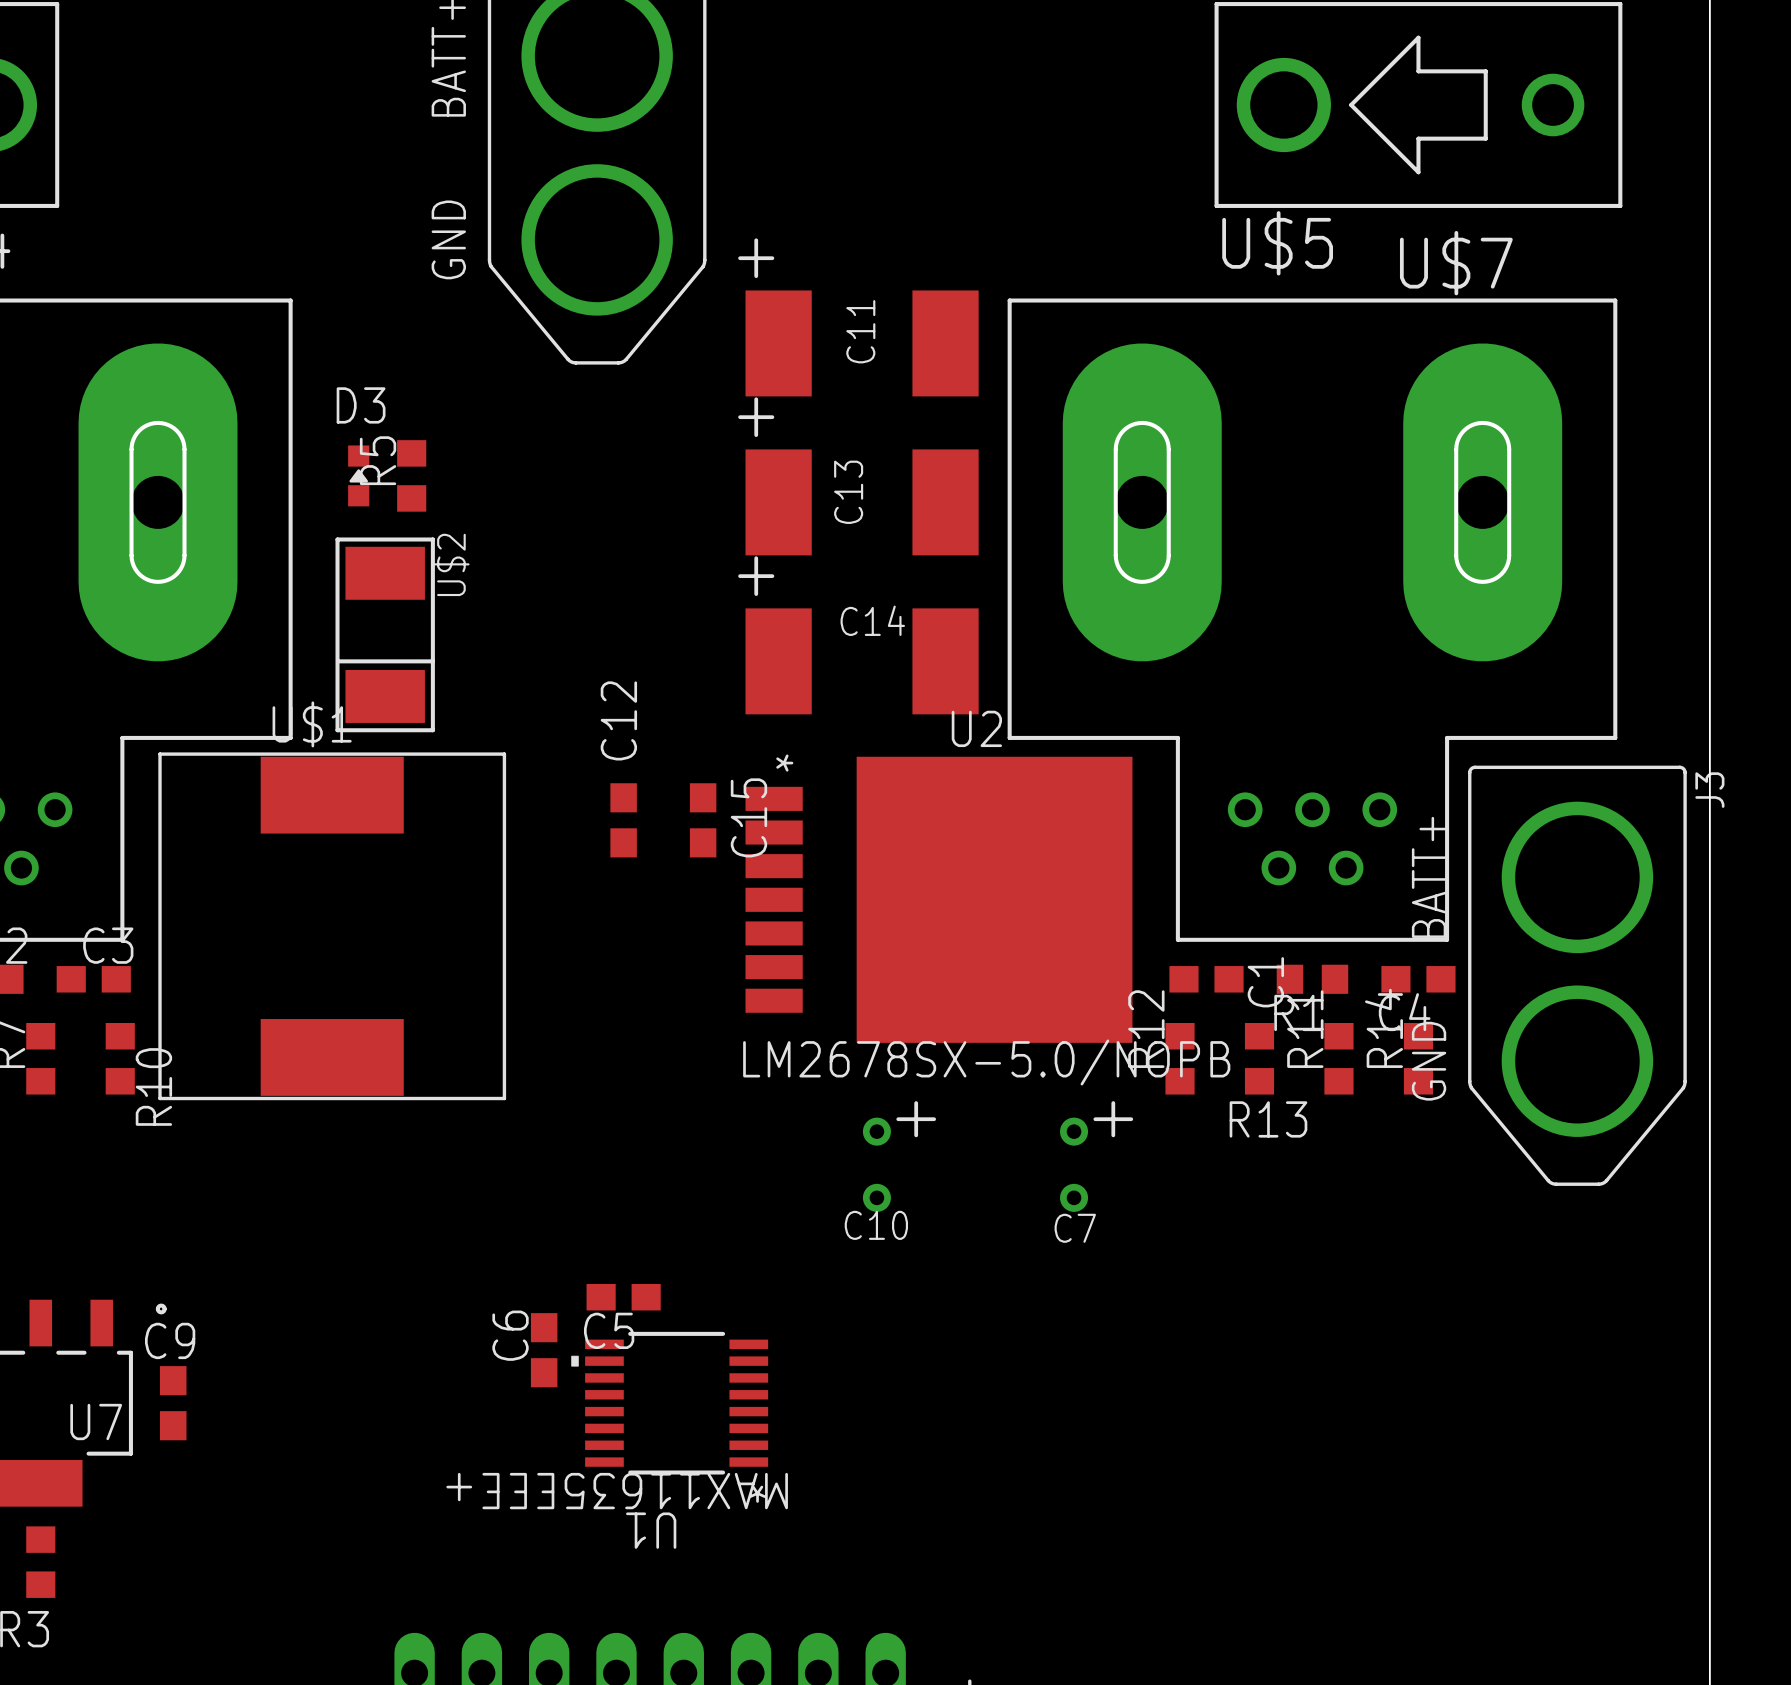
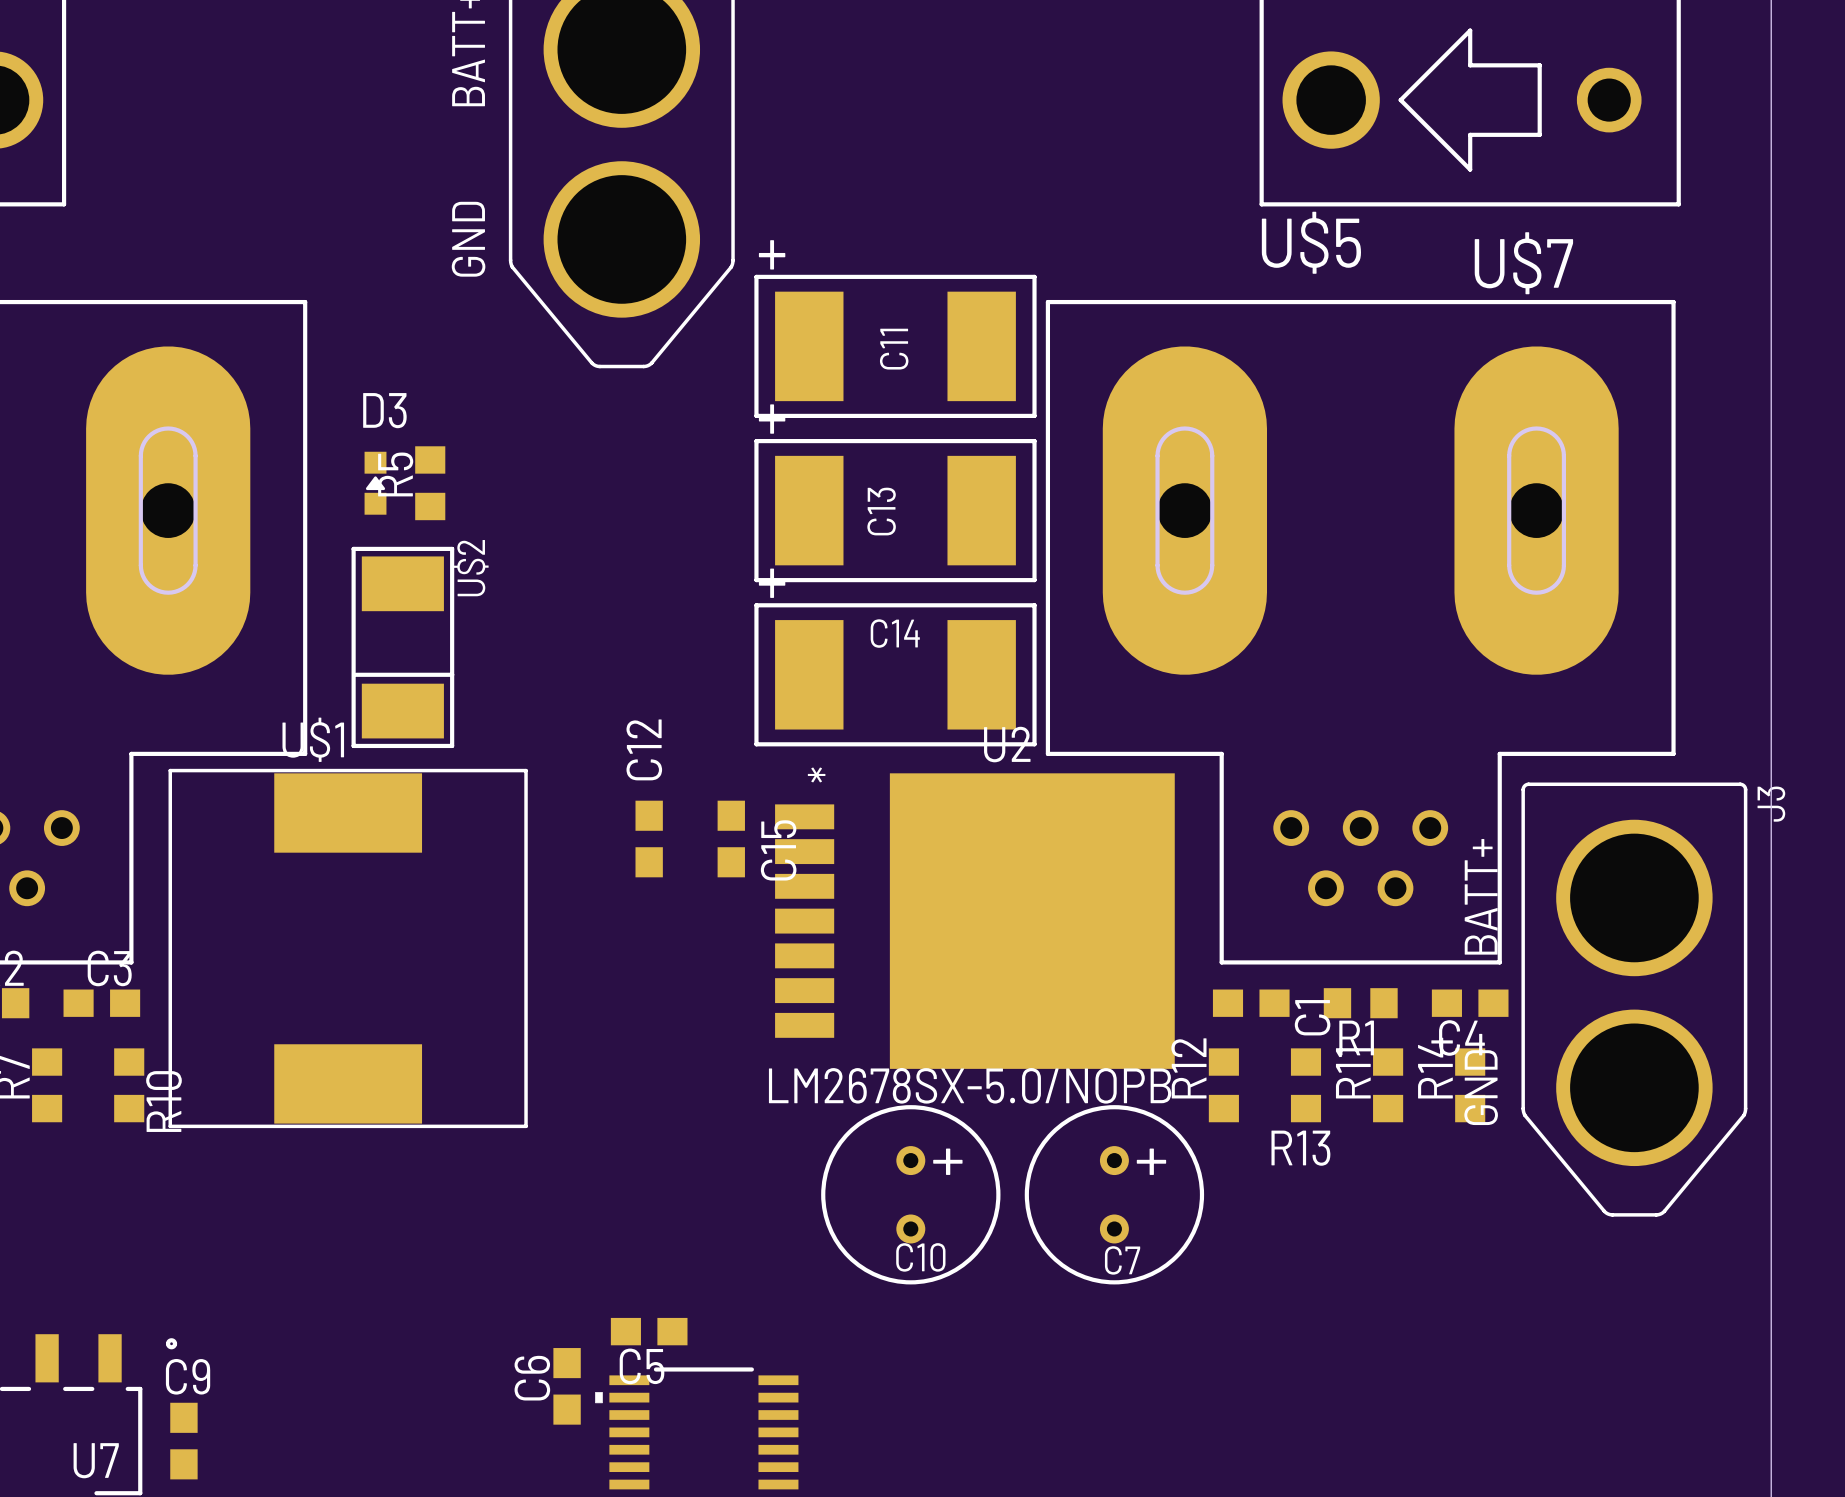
C11 footprint: [745, 290, 979, 397] -> [754, 274, 1037, 418]
C13 footprint: [745, 449, 979, 556] -> [754, 439, 1037, 583]
C14 footprint: [745, 608, 979, 715] -> [754, 603, 1037, 747]
C10 footprint: [862, 1117, 891, 1212] -> [821, 1105, 1001, 1285]
C7 footprint: [1060, 1117, 1089, 1212] -> [1024, 1105, 1205, 1285]

